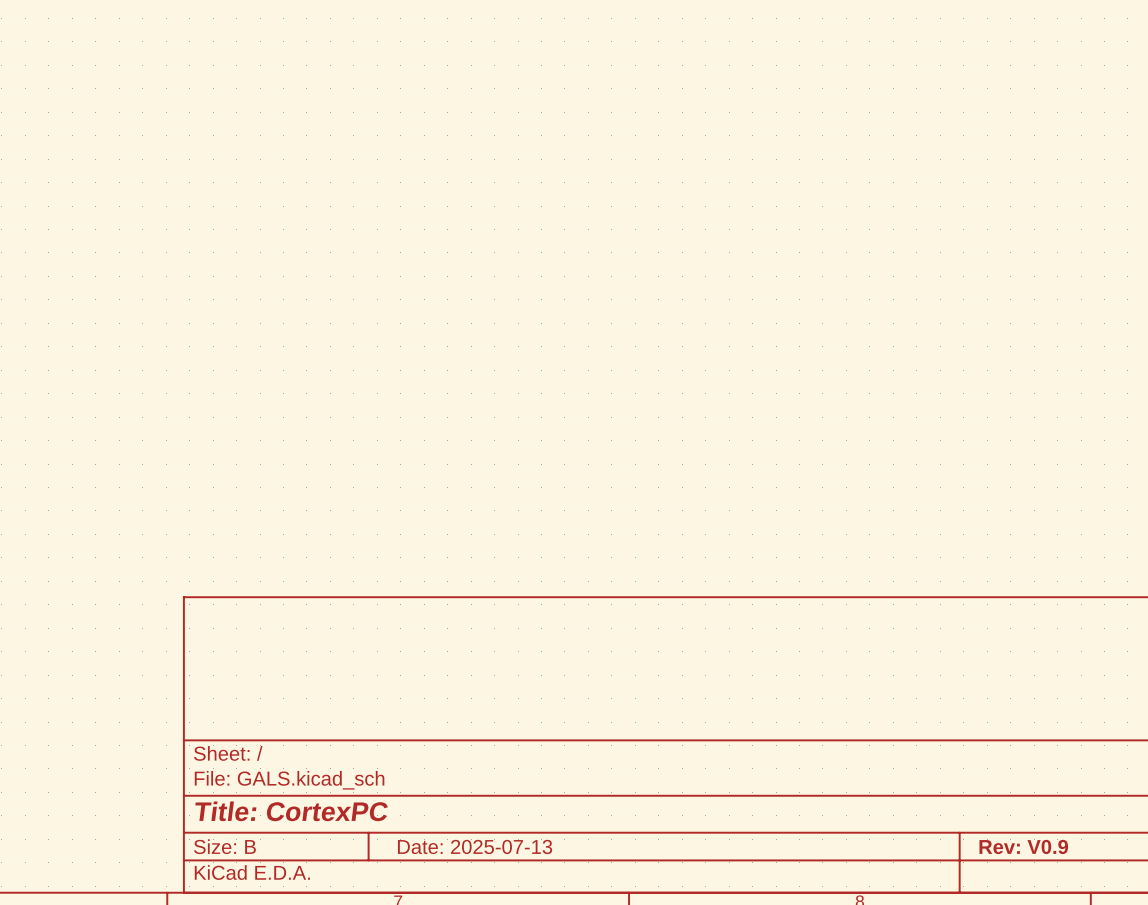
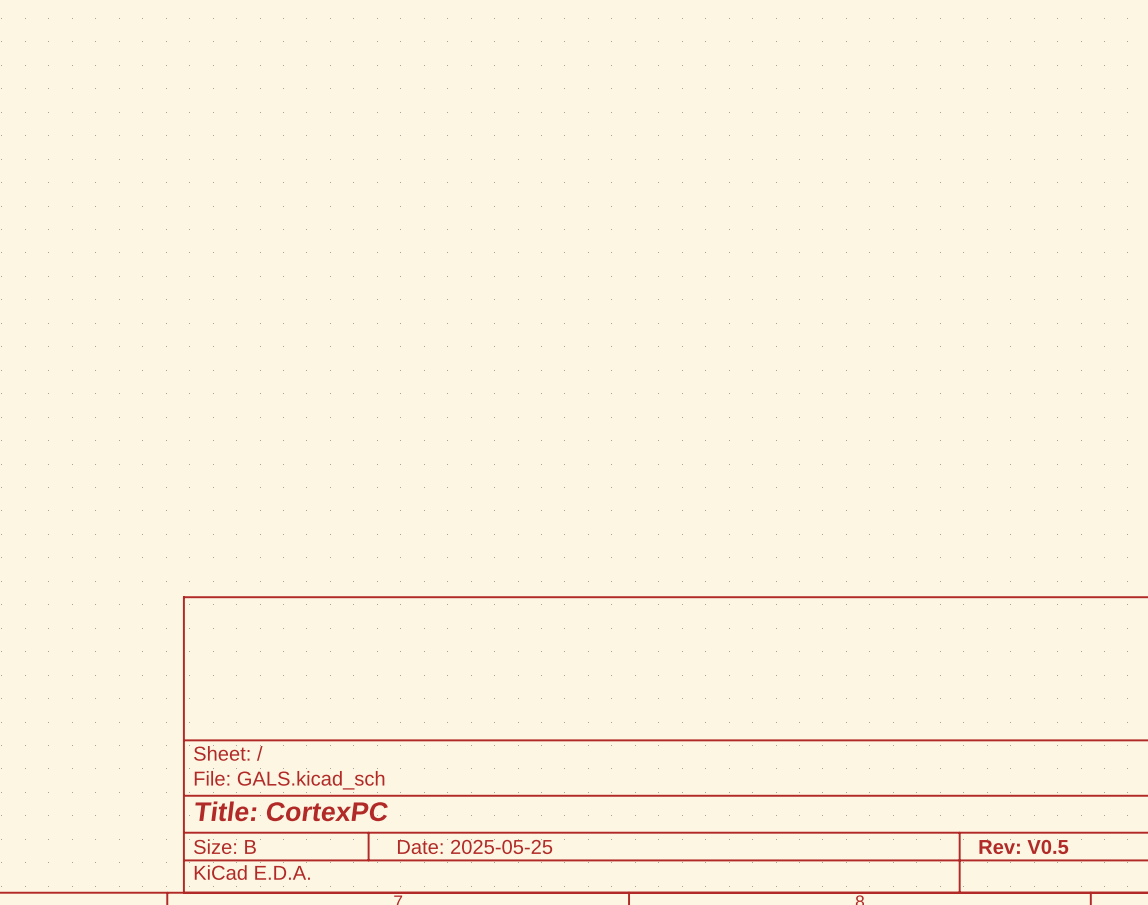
title block: Date: 2025-07-13 (475, 846) -> Date: 2025-05-25 (475, 846)
title block: Rev: V0.9 (1023, 846) -> Rev: V0.5 (1023, 846)

